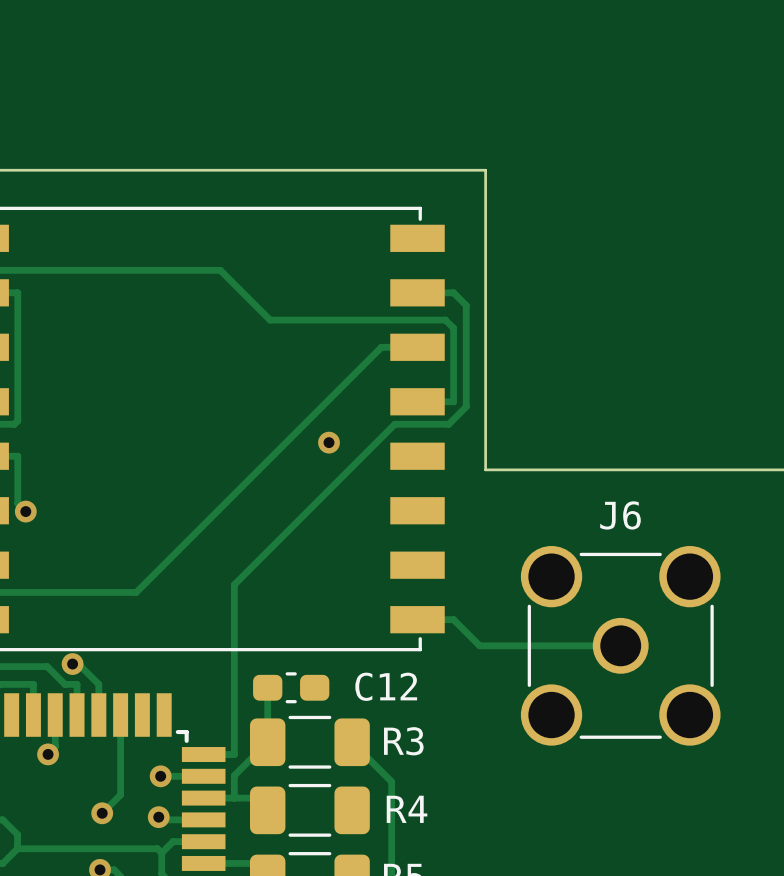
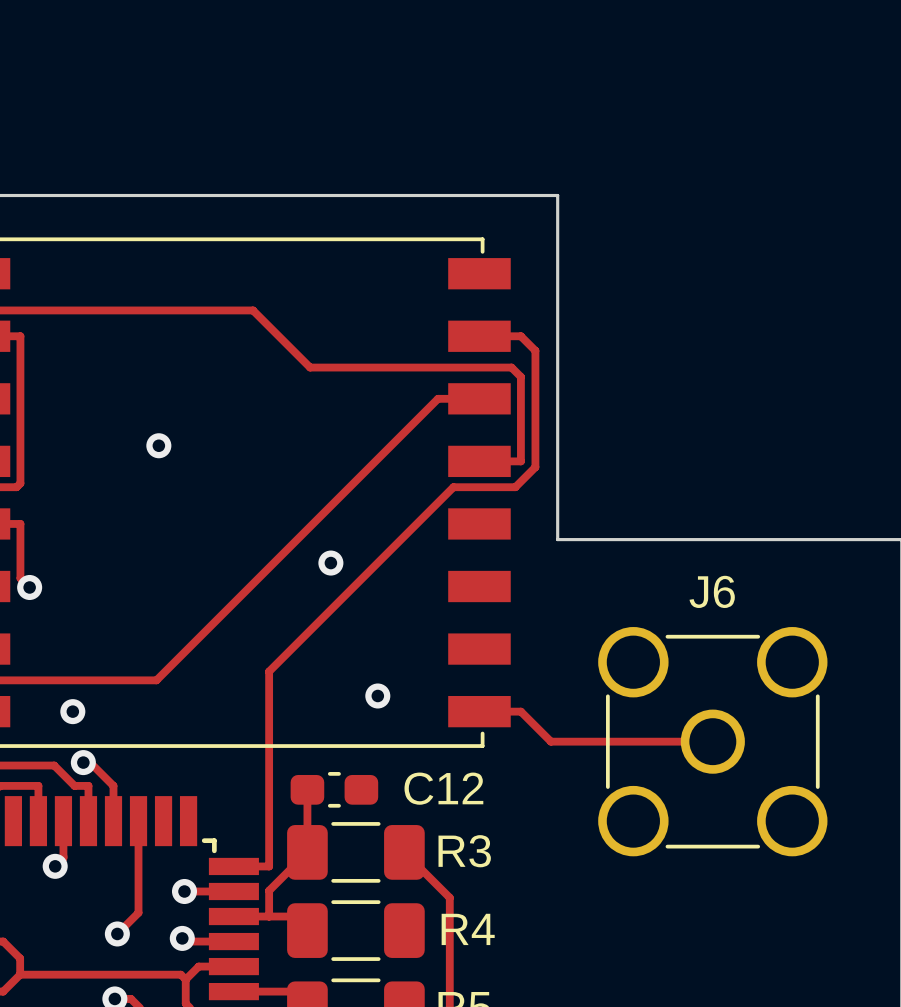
via: none -> (158, 445)
via position: (328, 442) -> (330, 563)
via: none -> (377, 695)
via: none -> (72, 711)

